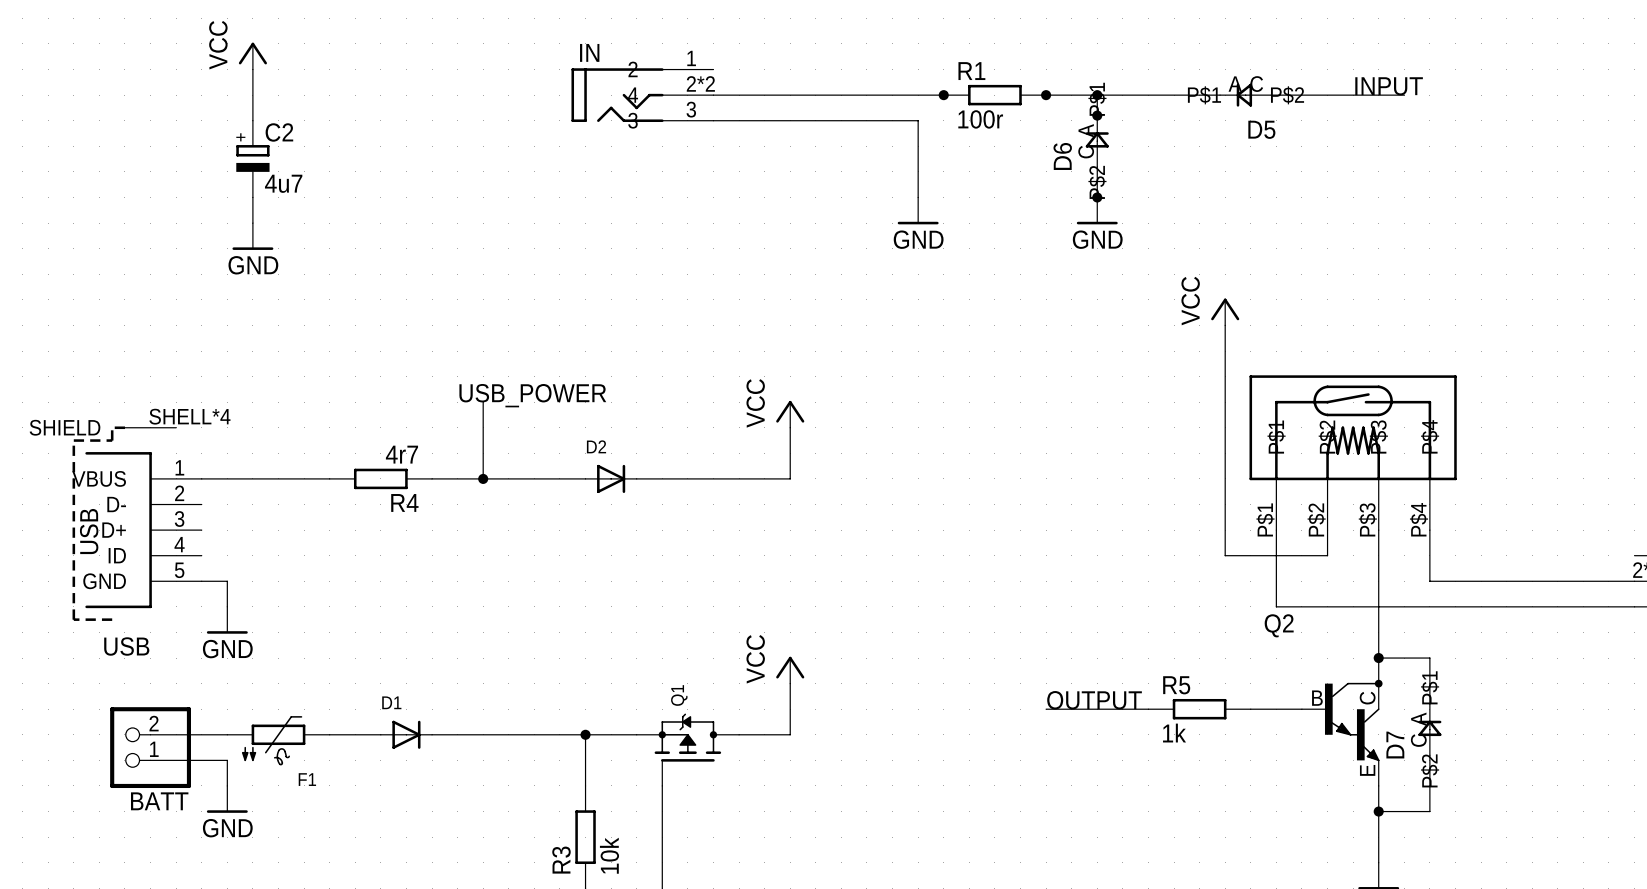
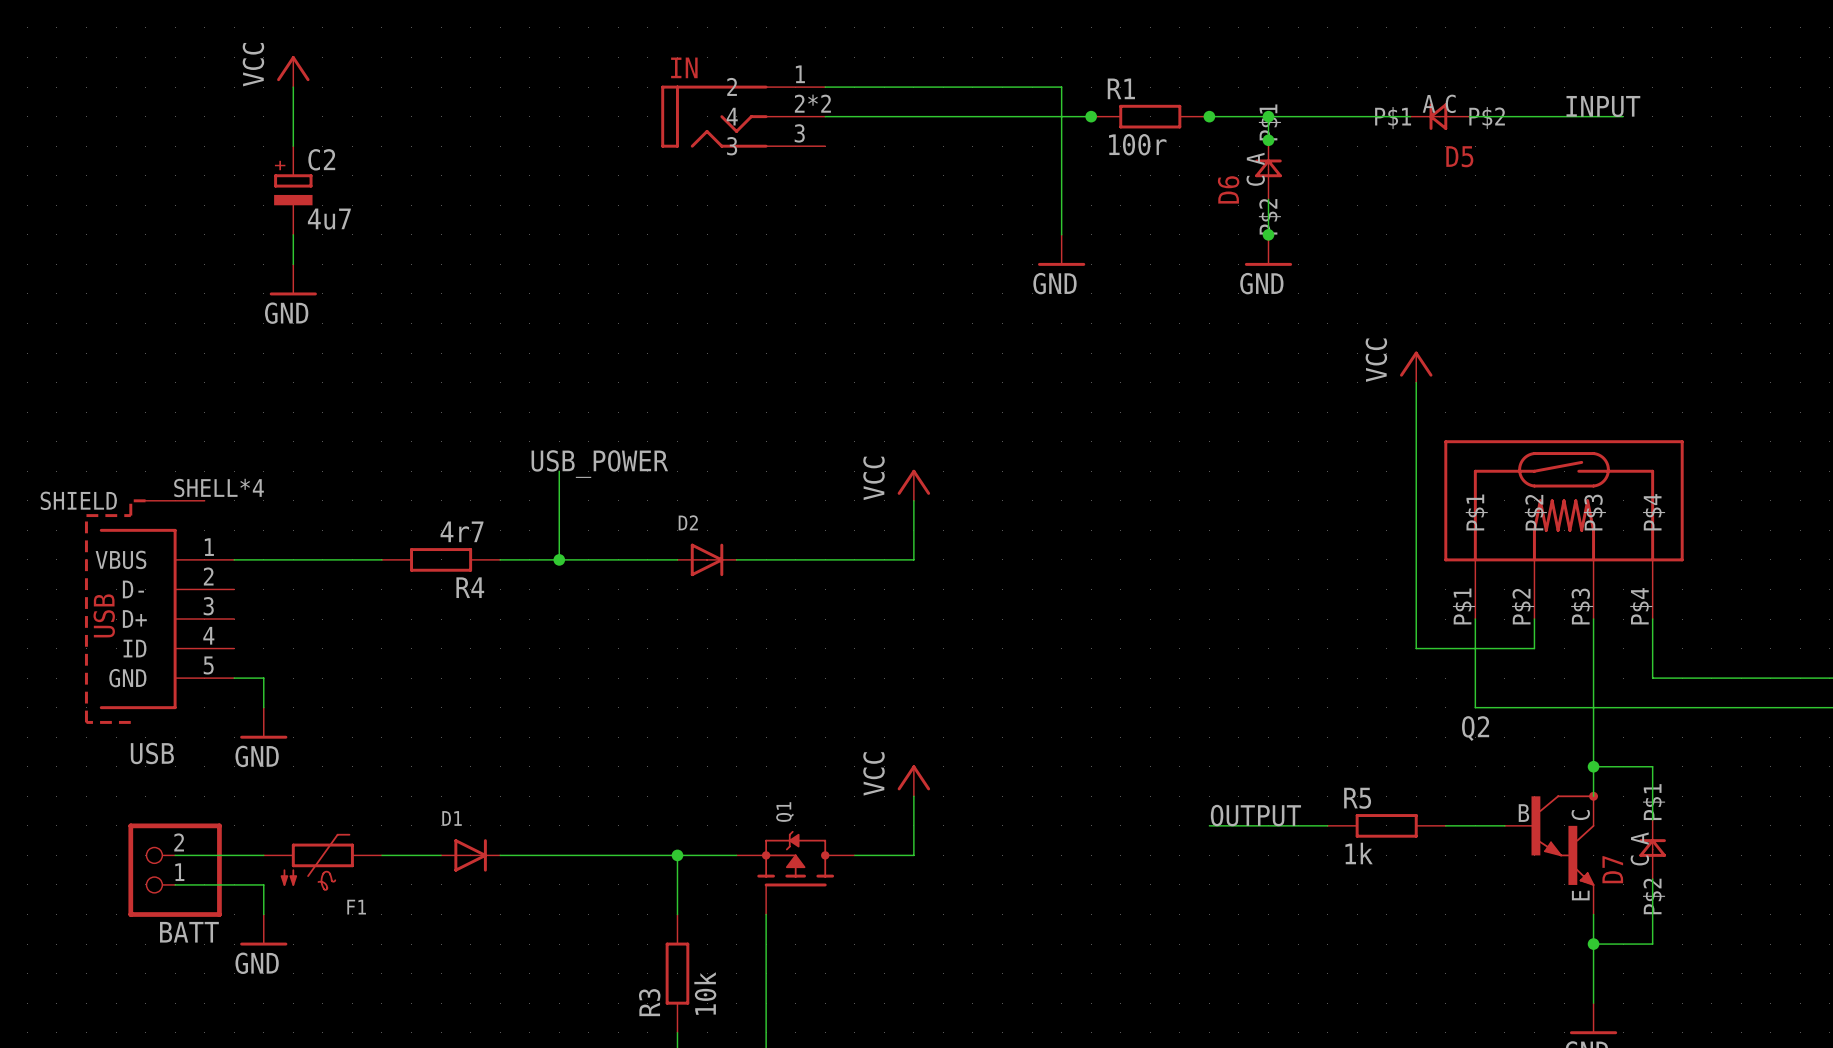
wire: (713, 120) (918, 120) -> (825, 87) (1061, 87) (1061, 146)

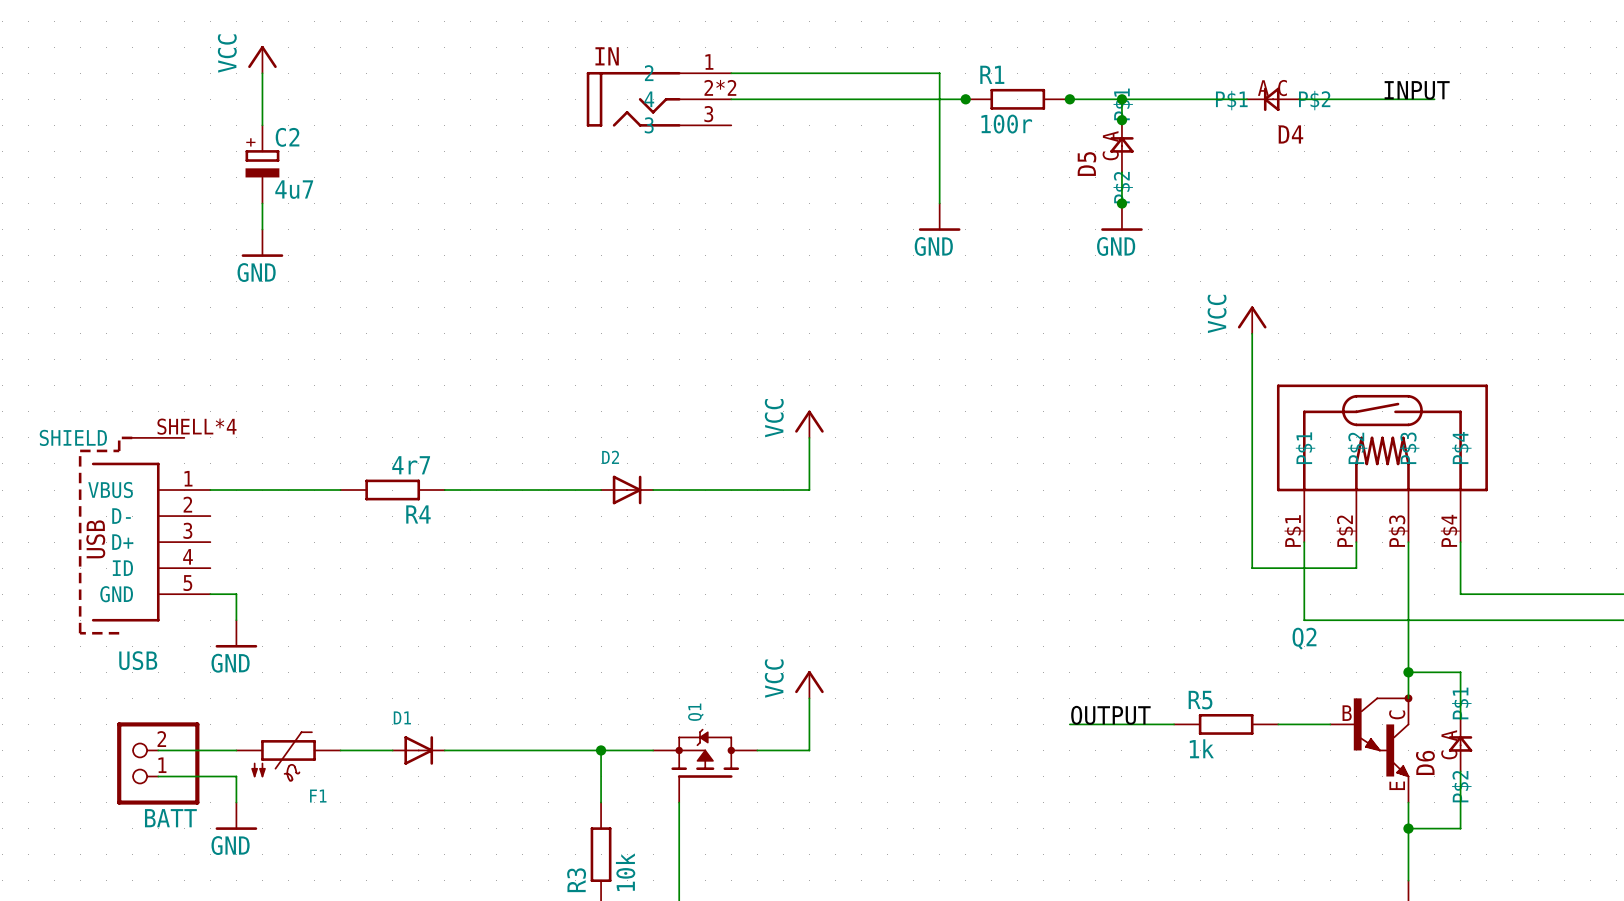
D5 name: D5 (1459, 156) -> D4 (1290, 134)
D6 name: D6 (1228, 189) -> D5 (1086, 164)
label: USB_POWER (599, 464) -> none
wire: (559, 471) (559, 559) -> none
junction: (559, 559) -> none
D7 name: D7 (1612, 869) -> D6 (1425, 762)

